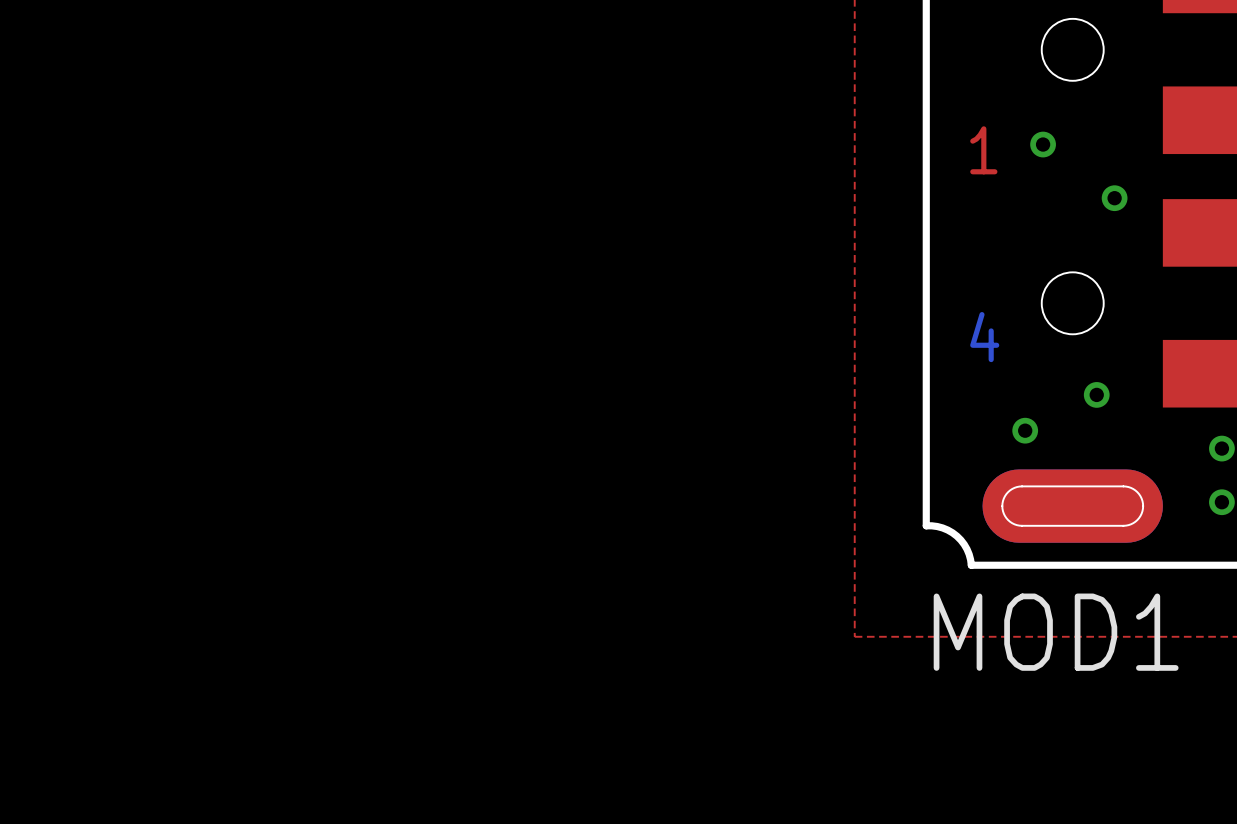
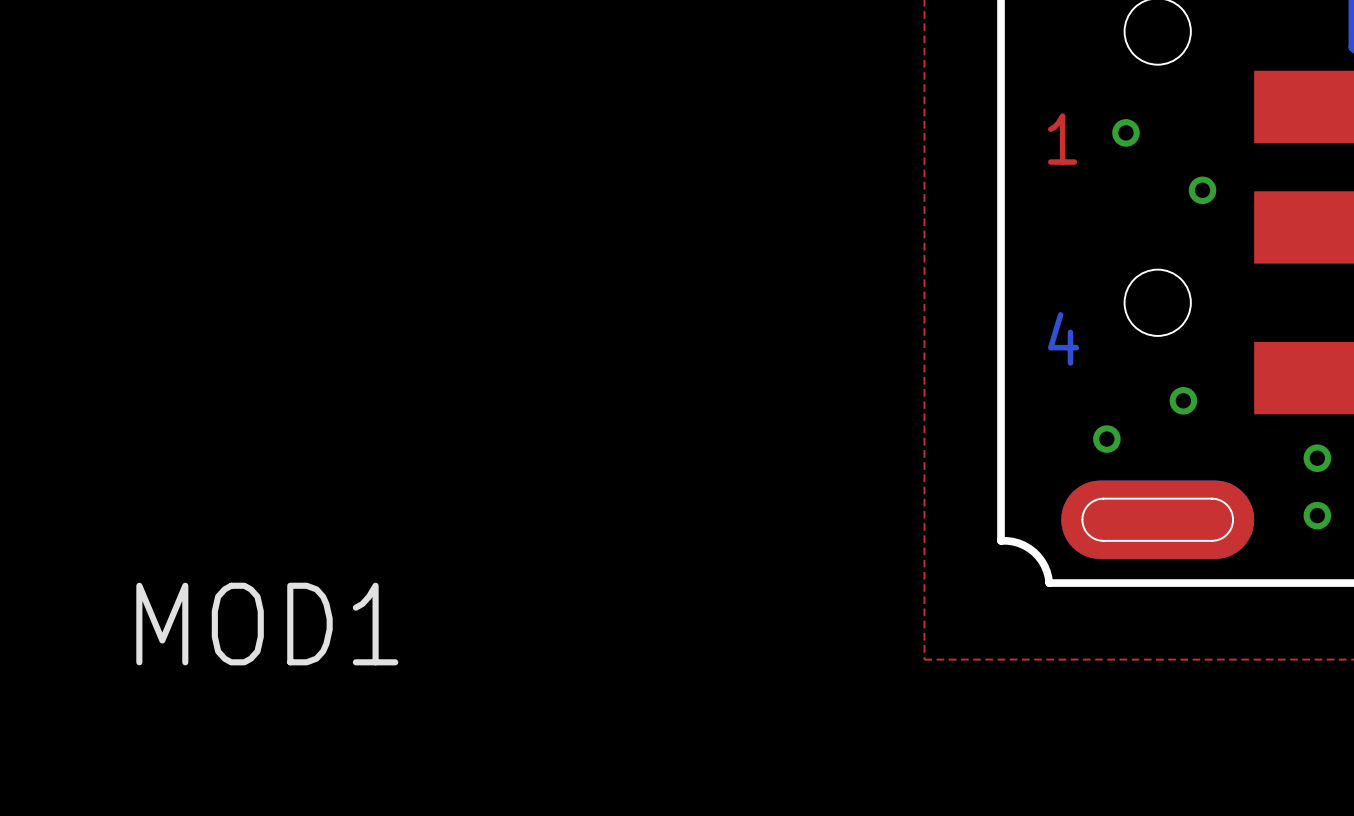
MOD1 name position: MOD1 (1056, 632) -> MOD1 (267, 624)

